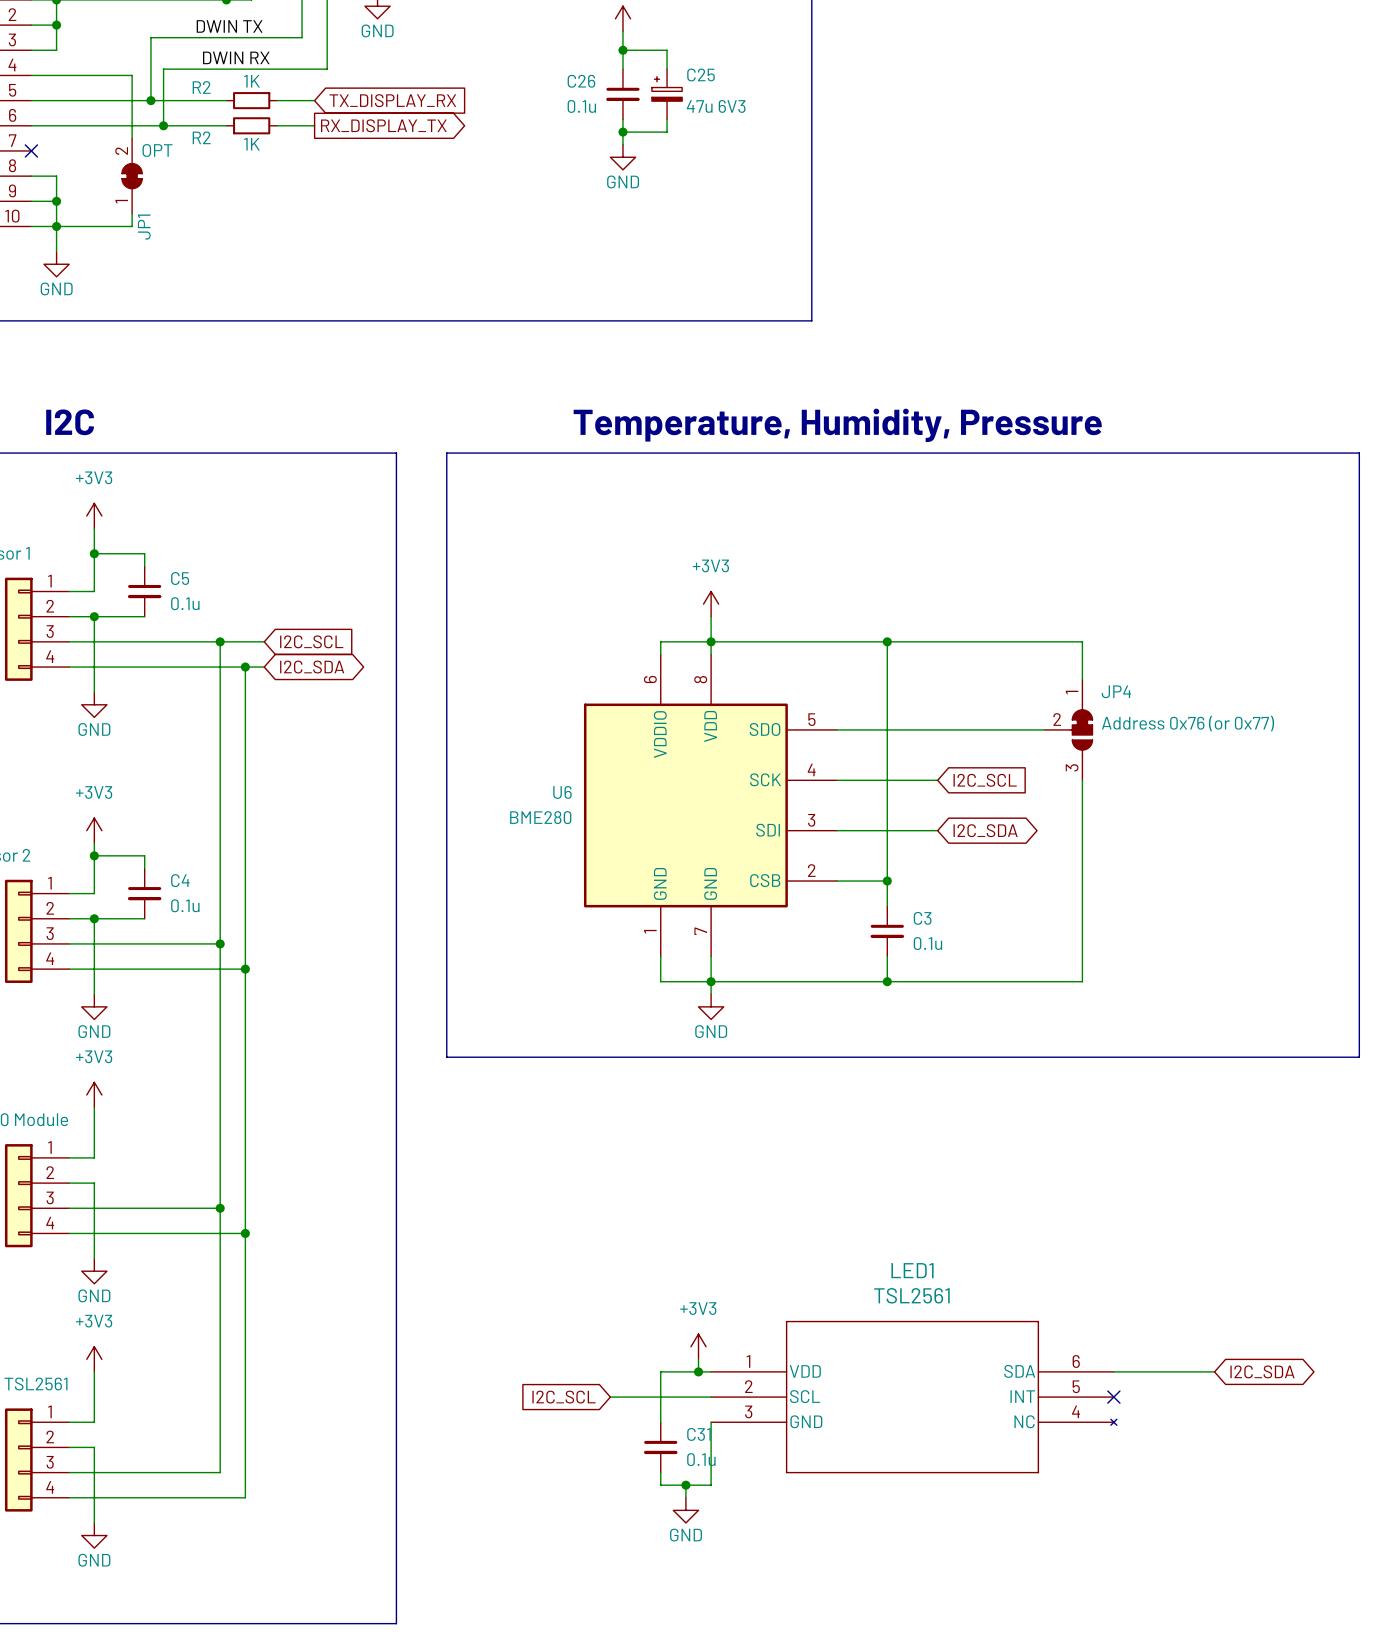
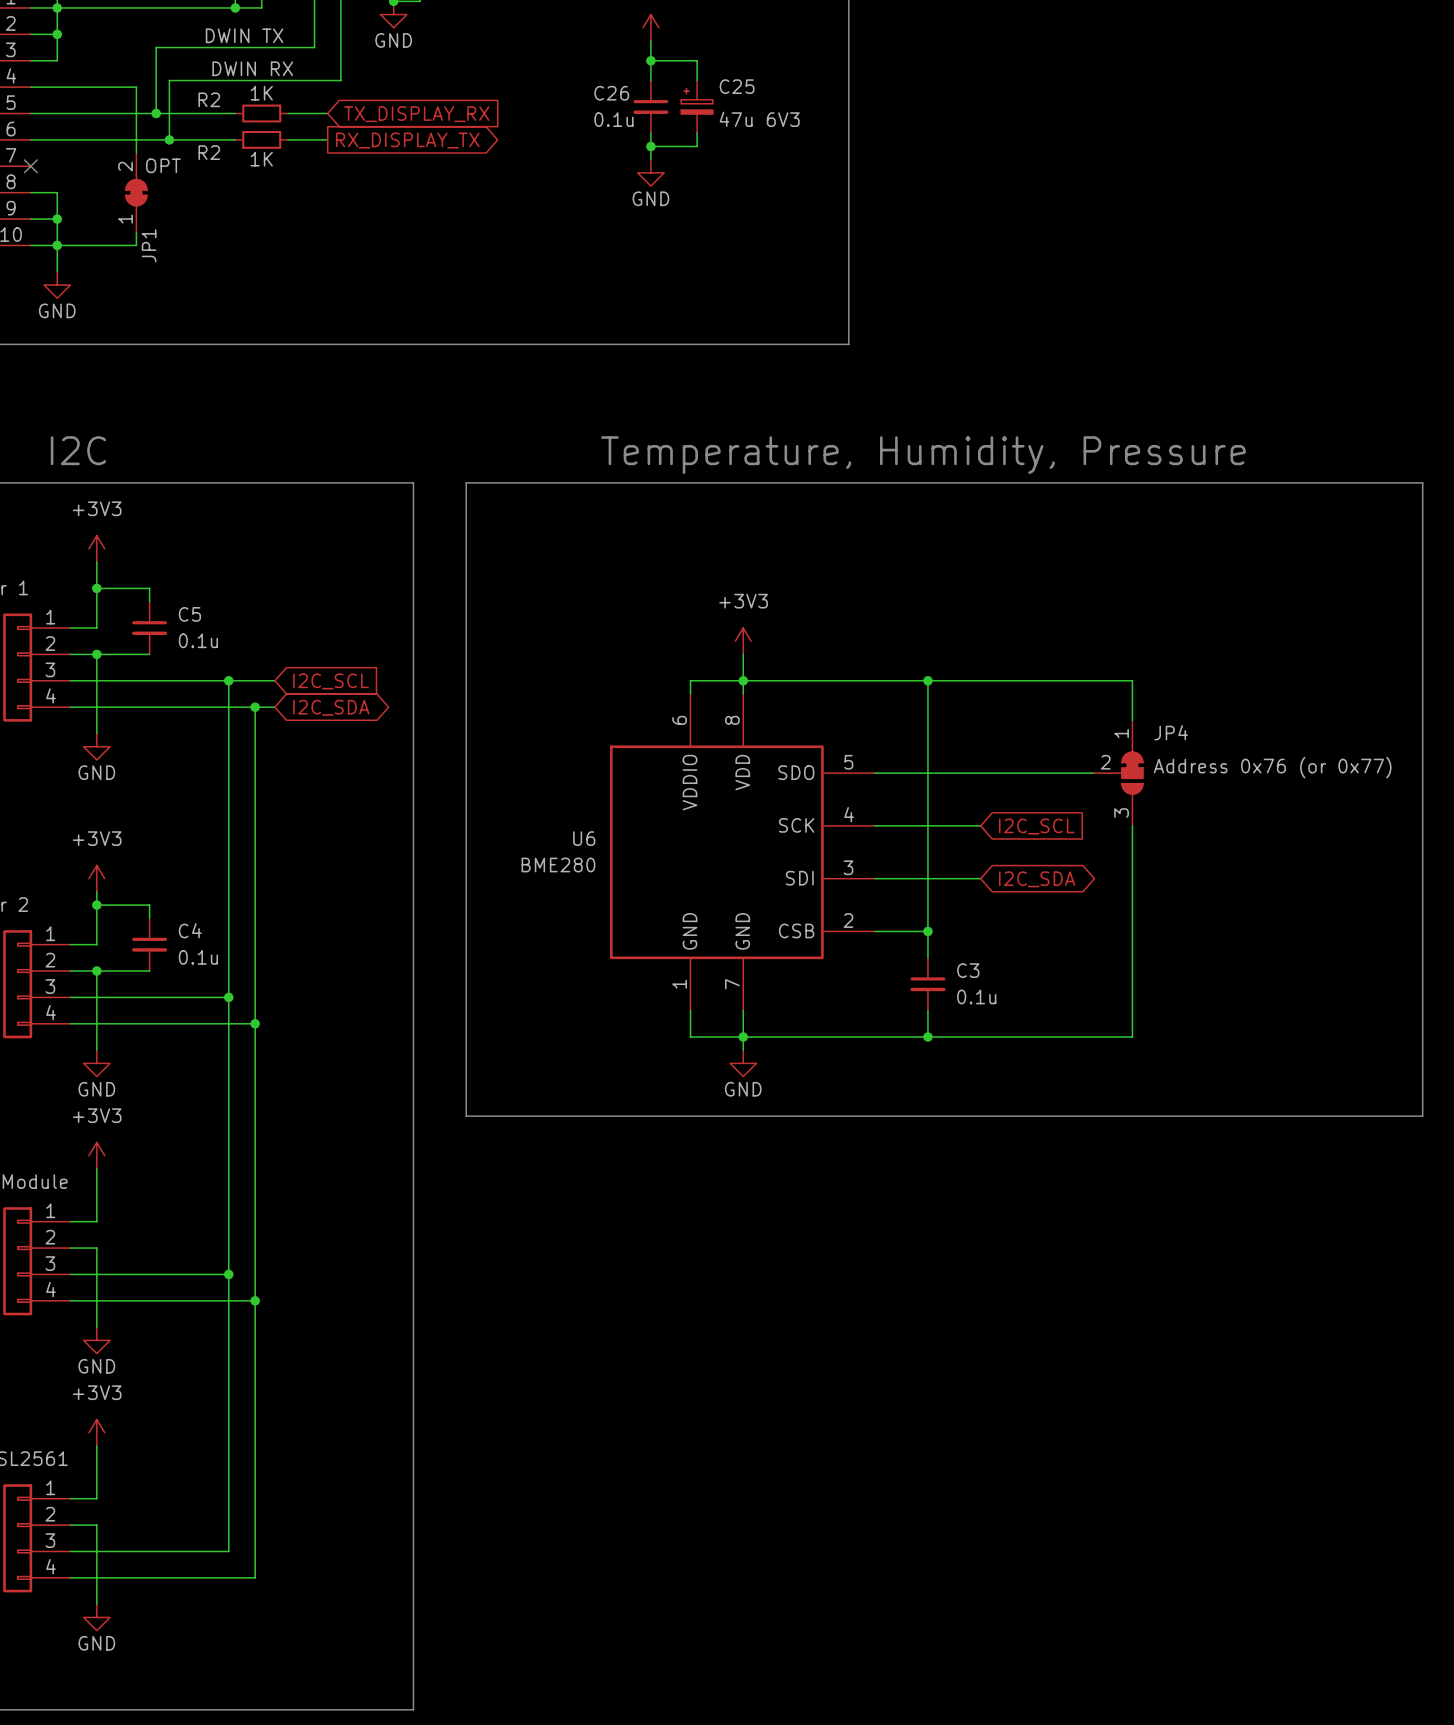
power symbol: +3V3 (698, 1346) -> none
wire: (698, 1359) (698, 1371) -> none
junction: (698, 1371) -> none
wire: (711, 1371) (660, 1371) (660, 1422) -> none
wire: (1113, 1371) (1214, 1371) -> none
global label: I2C_SDA (1262, 1371) -> none
global label: I2C_SCL (563, 1397) -> none
wire: (610, 1397) (711, 1397) -> none
LED1: TSL2561 (913, 1397) -> none
no-connect mark: (1113, 1397) -> none
wire: (711, 1422) (711, 1485) (660, 1485) (660, 1472) -> none
C31: 0.1u (660, 1447) -> none
wire: (685, 1485) (685, 1497) -> none
junction: (685, 1485) -> none
power symbol: GND (685, 1510) -> none

